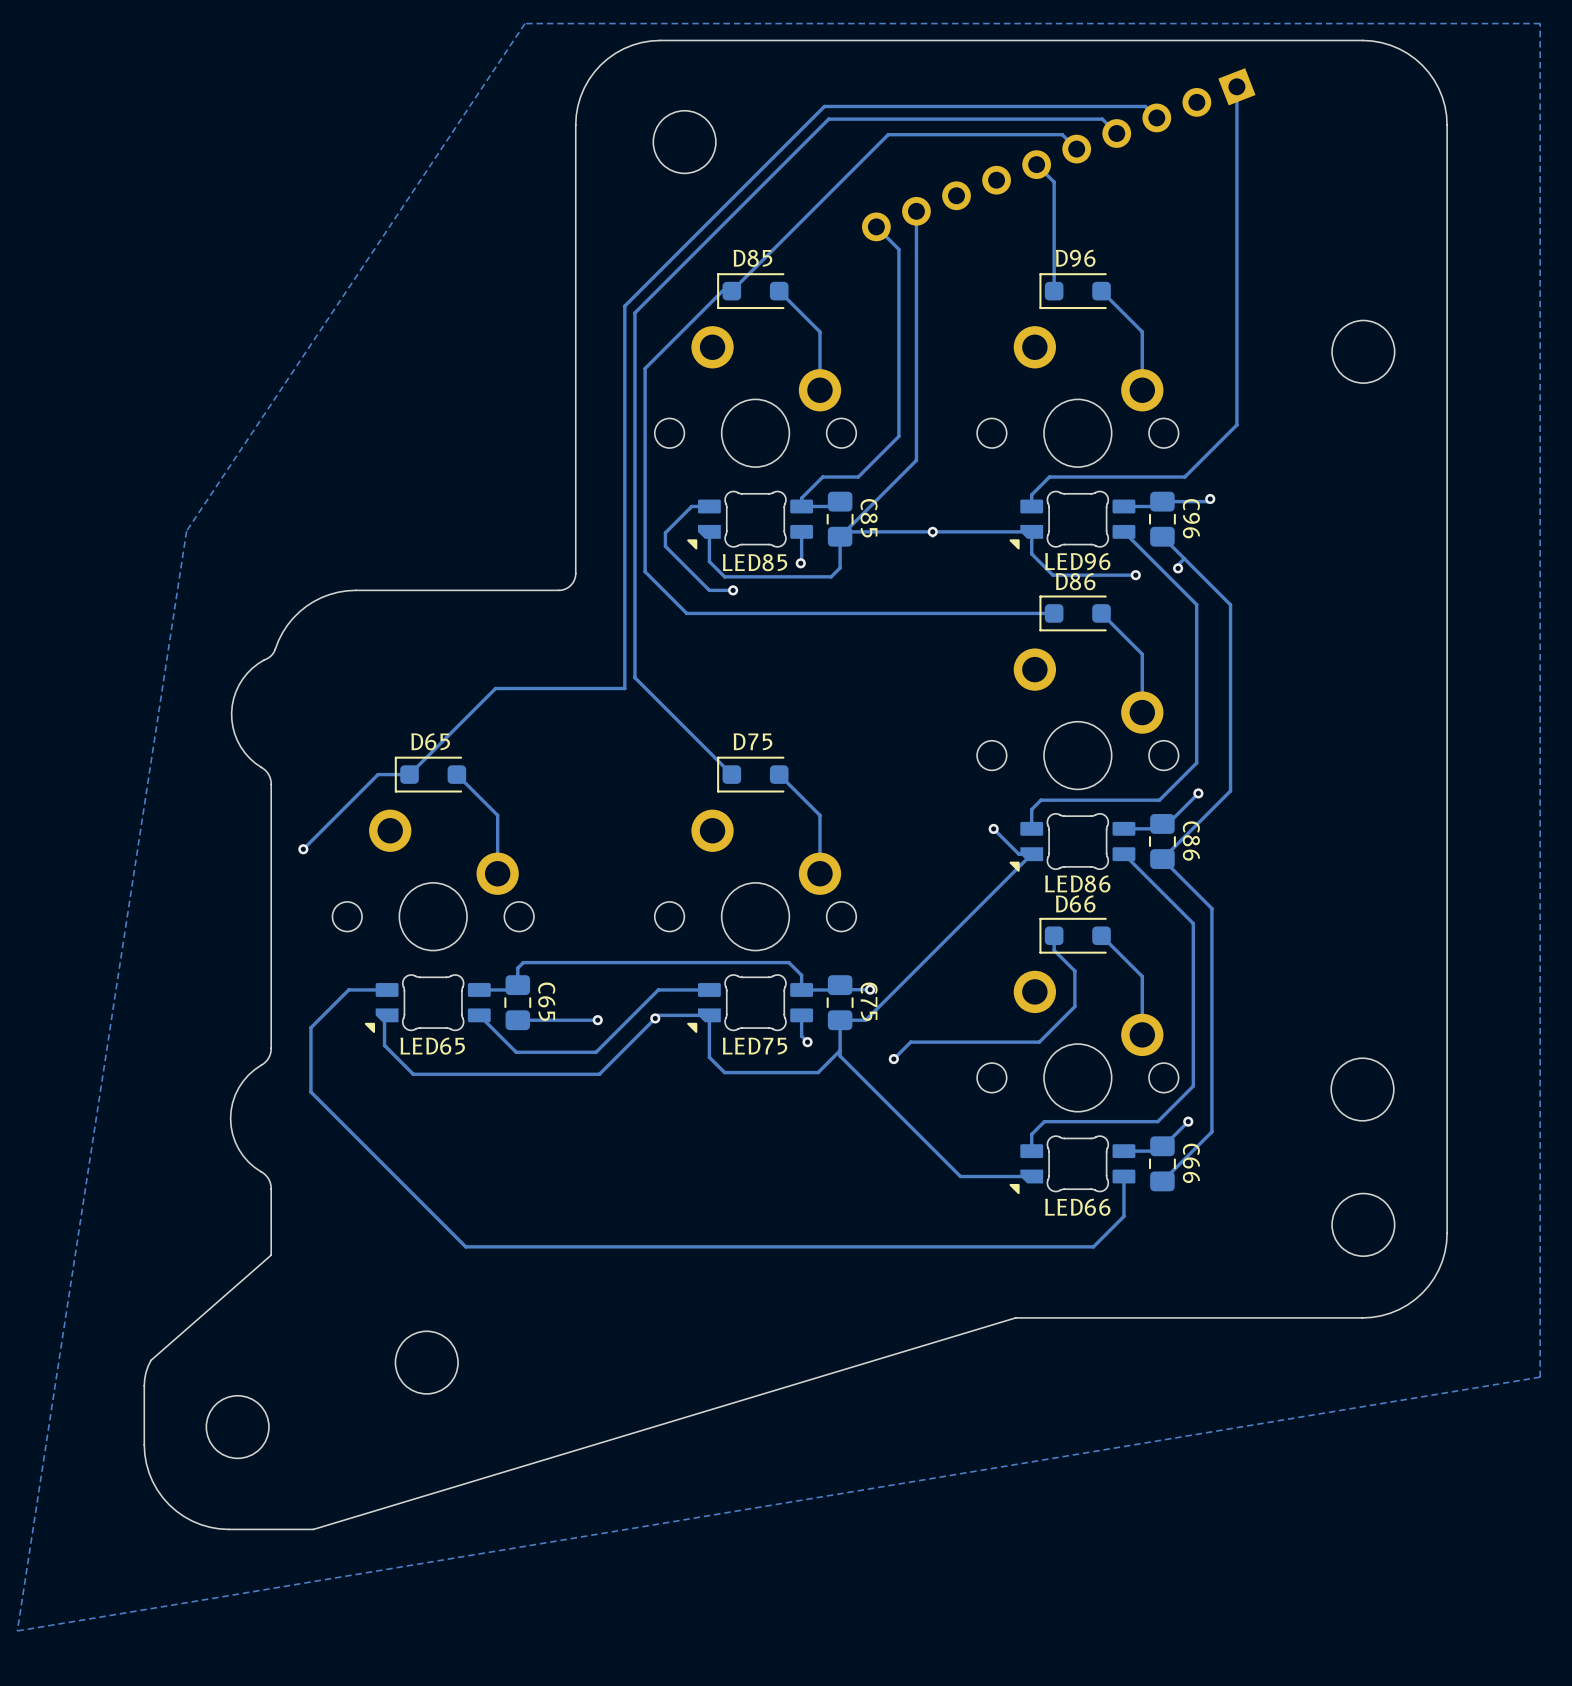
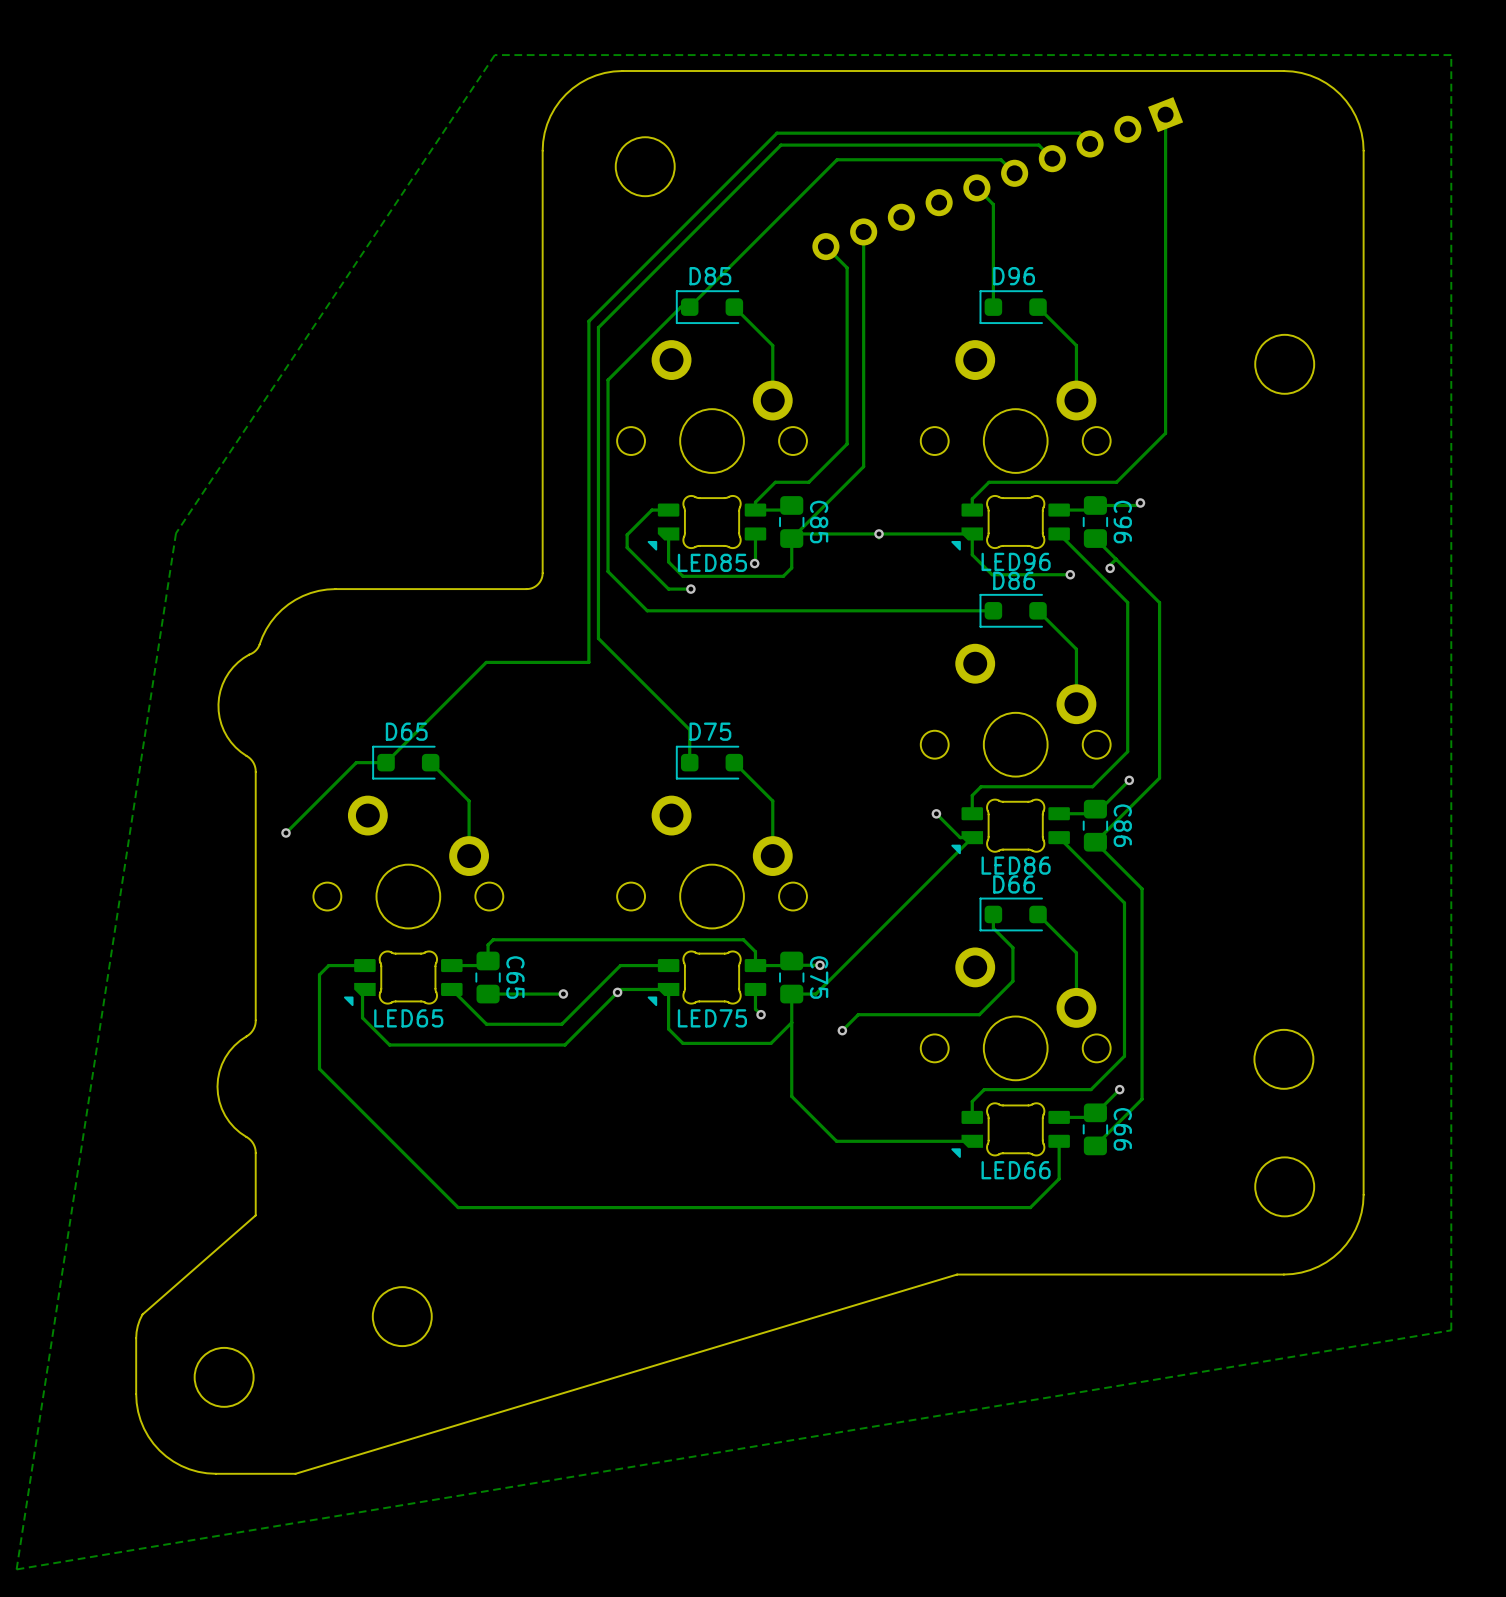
track: (634, 642) (634, 677) (731, 774) -> (598, 638) (689, 729) (689, 762)
track: (624, 668) (624, 688) (495, 688) -> (588, 662) (486, 662) (467, 681)
track: (338, 999) (310, 1027) (310, 1092) (465, 1246) (486, 1246) -> (319, 974) (319, 1068) (458, 1207)
track: (840, 1056) (960, 1176) -> (791, 1027) (791, 1096) (836, 1141) (905, 1141)

